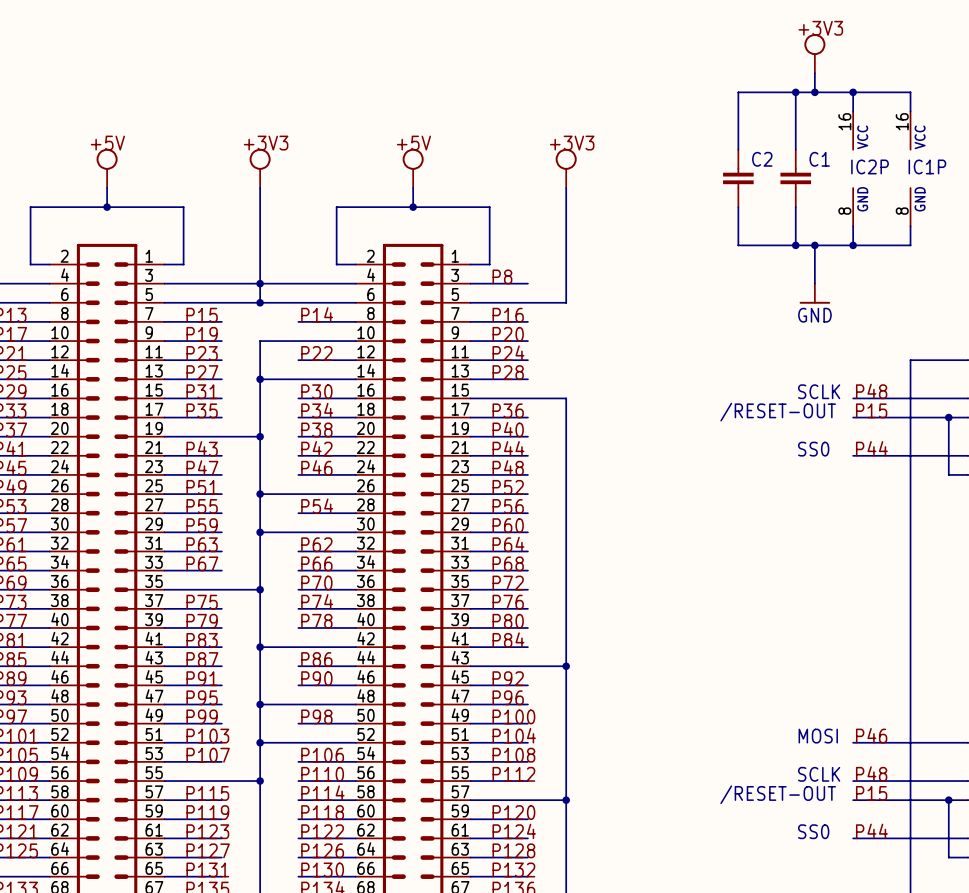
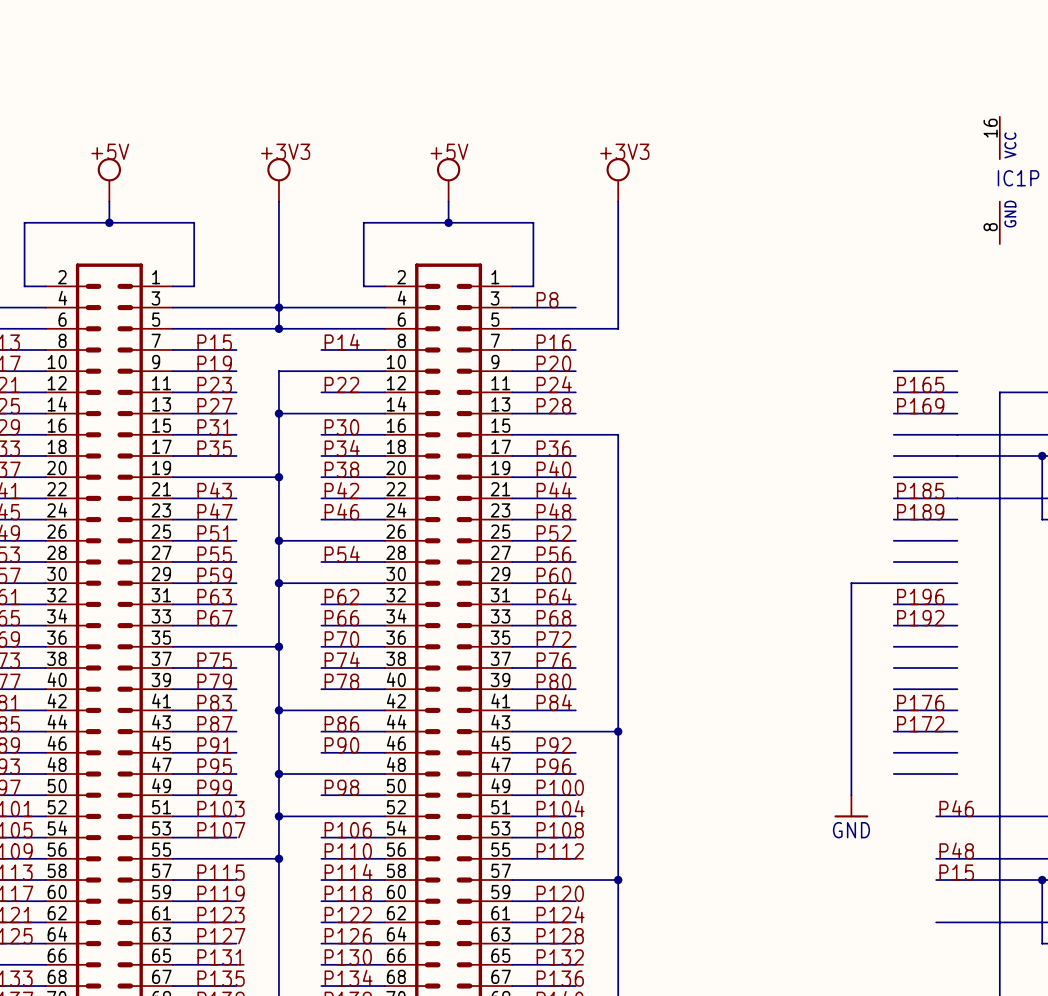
label: +3V3 (820, 28) -> none
power symbol: (814, 53) -> none
wire: (814, 73) (814, 92) -> none
wire: (795, 92) (795, 149) -> none
junction: (795, 92) -> none
junction: (814, 92) -> none
wire: (853, 92) (853, 111) -> none
junction: (853, 92) -> none
wire: (910, 111) (910, 92) (738, 92) (738, 149) -> none
IC2P: (853, 168) -> none
C2: (738, 178) -> none
C1: (795, 178) -> none
wire: (738, 207) (738, 245) (910, 245) (910, 226) -> none
wire: (795, 207) (795, 245) -> none
wire: (853, 226) (853, 245) -> none
junction: (795, 245) -> none
wire: (814, 245) (814, 283) -> none
junction: (814, 245) -> none
junction: (853, 245) -> none
power symbol: GND (814, 293) -> none
wire: none -> (893, 371) (957, 371)
label: none -> P165 (920, 384)
wire: none -> (893, 392) (957, 392)
label: none -> P169 (920, 406)
wire: none -> (893, 413) (957, 413)
text: SCLK (819, 391) -> none
label: P48 (871, 391) -> none
wire: none -> (893, 434) (936, 434)
label: P15 (871, 410) -> none
text: /RESET-OUT (778, 412) -> none
wire: none -> (893, 455) (936, 455)
wire: none -> (893, 477) (957, 477)
label: P44 (871, 448) -> none
text: SS0 (813, 449) -> none
label: none -> P185 (920, 490)
wire: none -> (893, 498) (936, 498)
label: none -> P189 (920, 512)
wire: none -> (893, 519) (957, 519)
wire: none -> (893, 540) (957, 540)
wire: none -> (893, 562) (957, 562)
wire: none -> (957, 583) (851, 583) (851, 795)
label: none -> P196 (920, 596)
wire: none -> (893, 604) (957, 604)
label: none -> P192 (920, 618)
wire: none -> (893, 625) (957, 625)
wire: none -> (893, 646) (957, 646)
wire: none -> (893, 668) (957, 668)
wire: none -> (893, 689) (957, 689)
label: none -> P176 (920, 702)
wire: none -> (893, 710) (957, 710)
label: none -> P172 (920, 724)
wire: none -> (893, 731) (957, 731)
wire: none -> (893, 752) (957, 752)
wire: none -> (893, 774) (957, 774)
power symbol: none -> GND (851, 806)
text: MOSI (818, 736) -> none
text: SCLK (819, 774) -> none
text: /RESET-OUT (778, 794) -> none
text: SS0 (813, 831) -> none
label: P44 (871, 831) -> none

